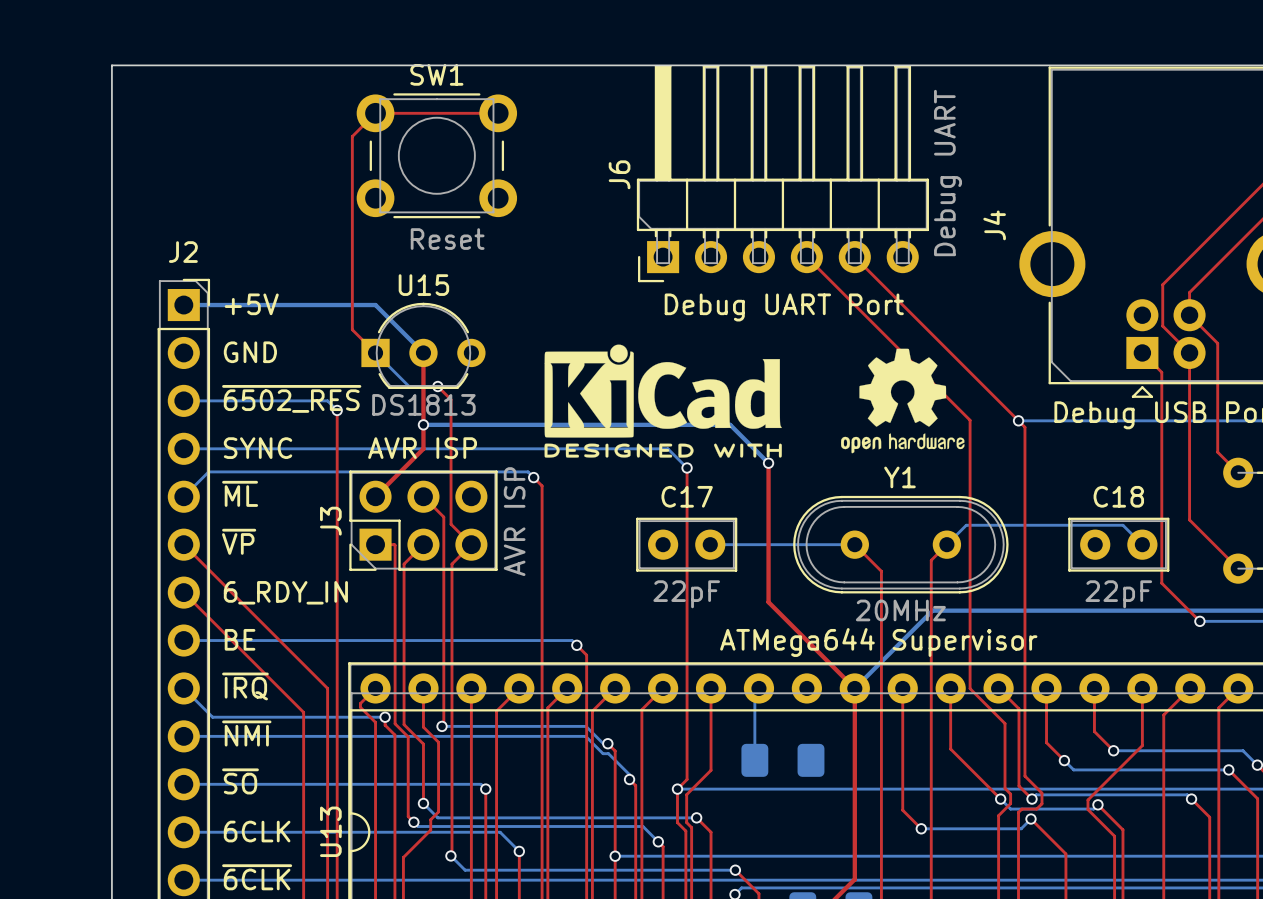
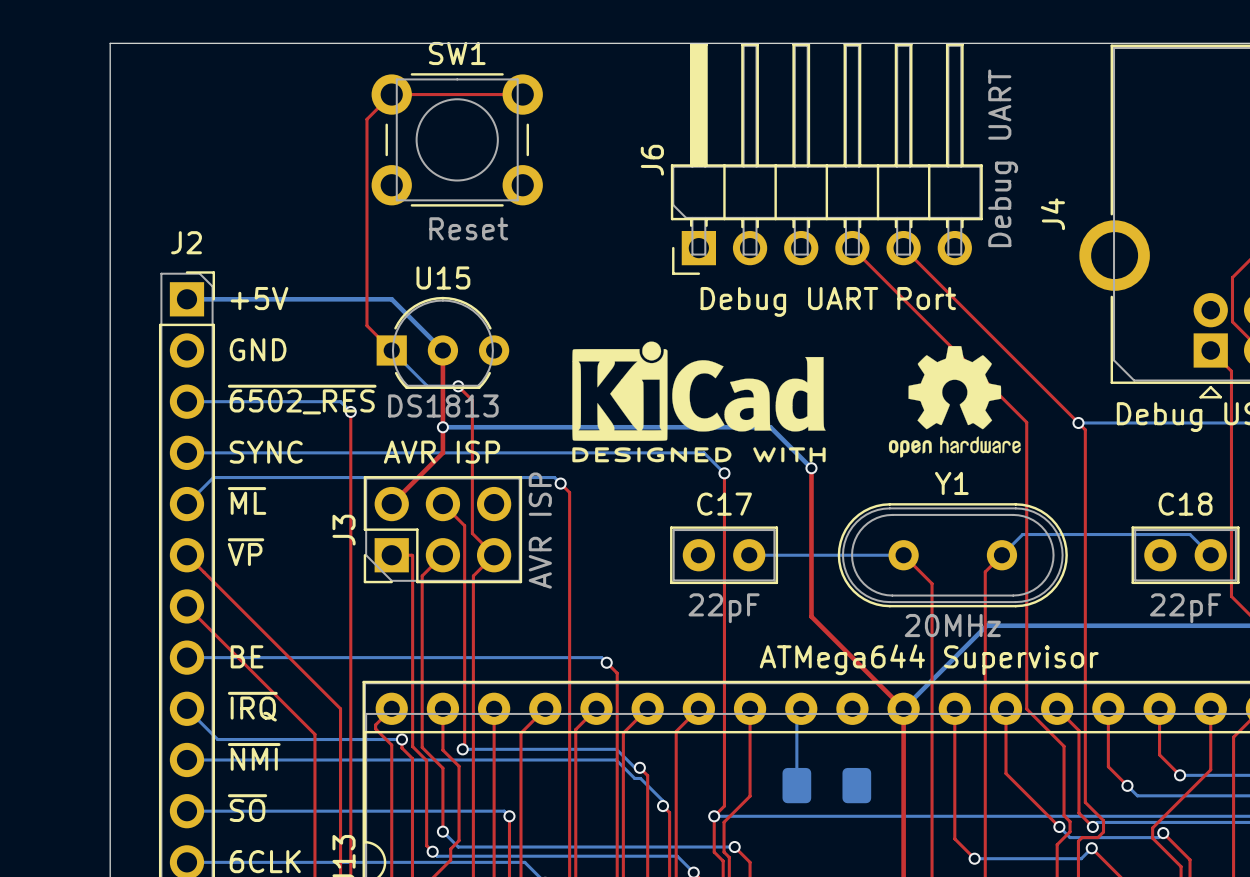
text: 6_RDY_IN (285, 592) -> none

